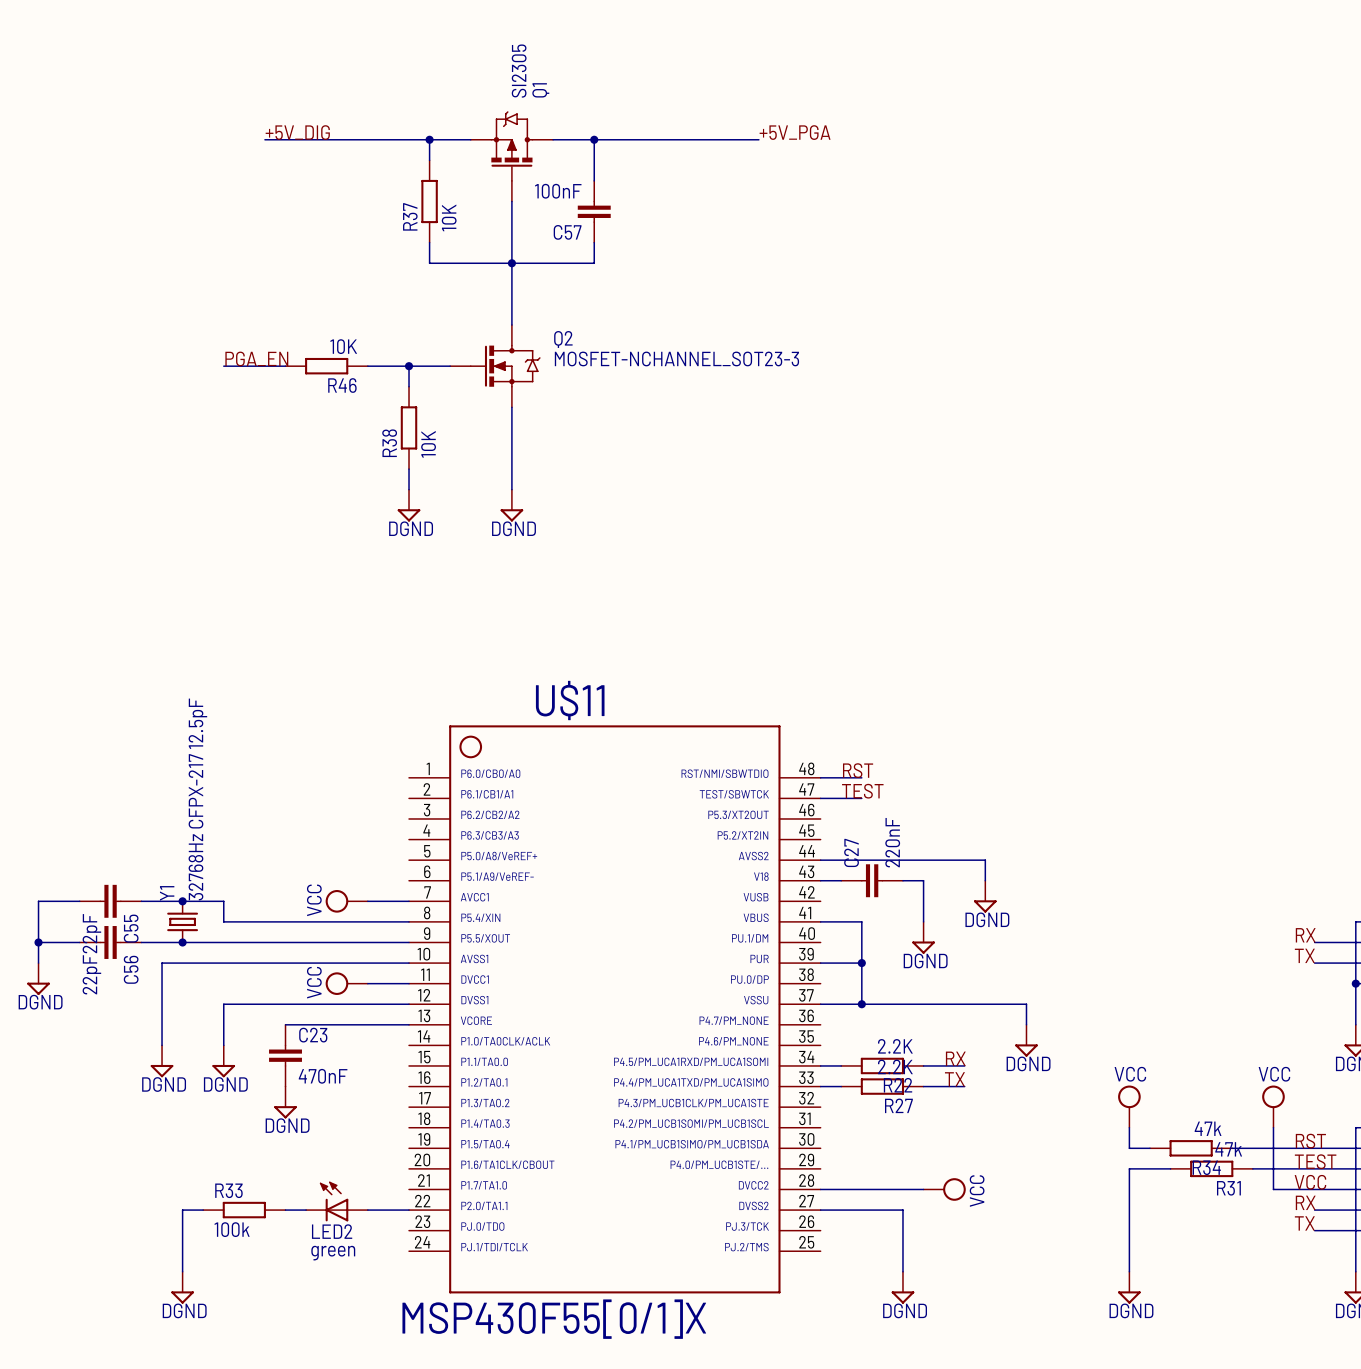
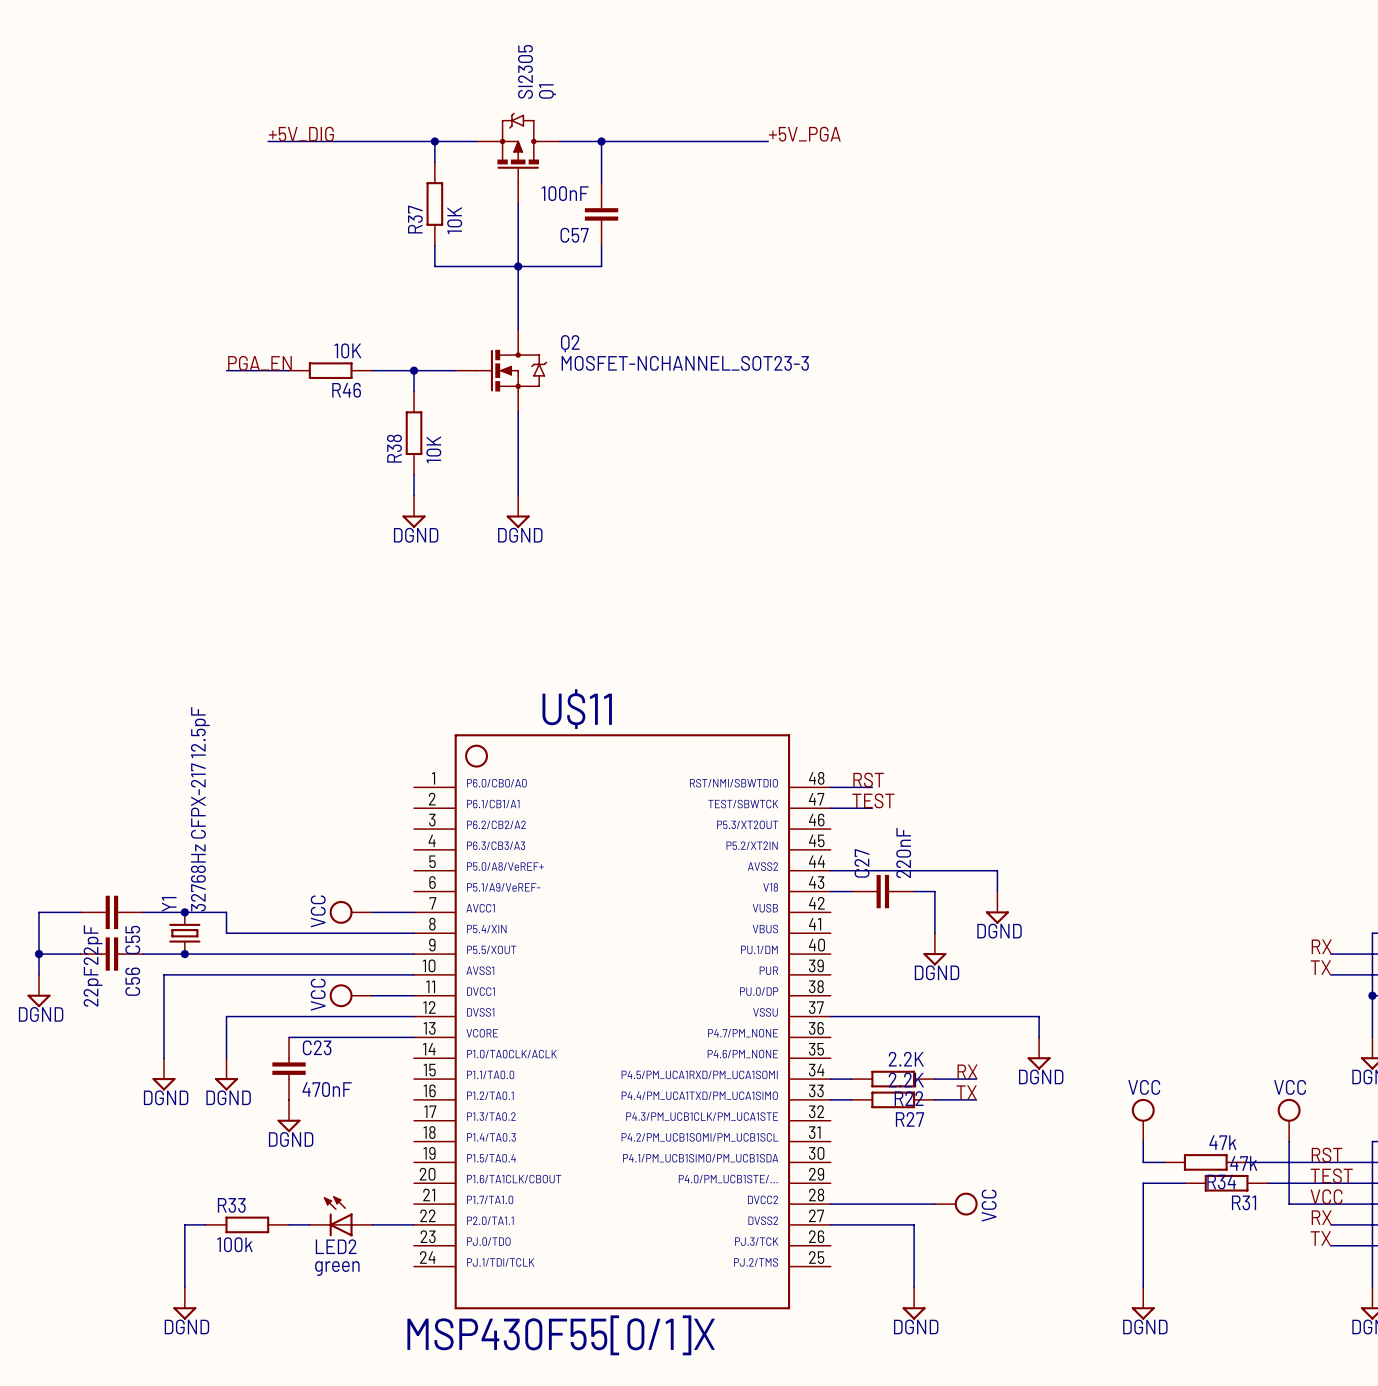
wire: (820, 921) (861, 921) (861, 1004) -> none
wire: (820, 963) (861, 963) -> none
junction: (861, 963) -> none
junction: (861, 1004) -> none

